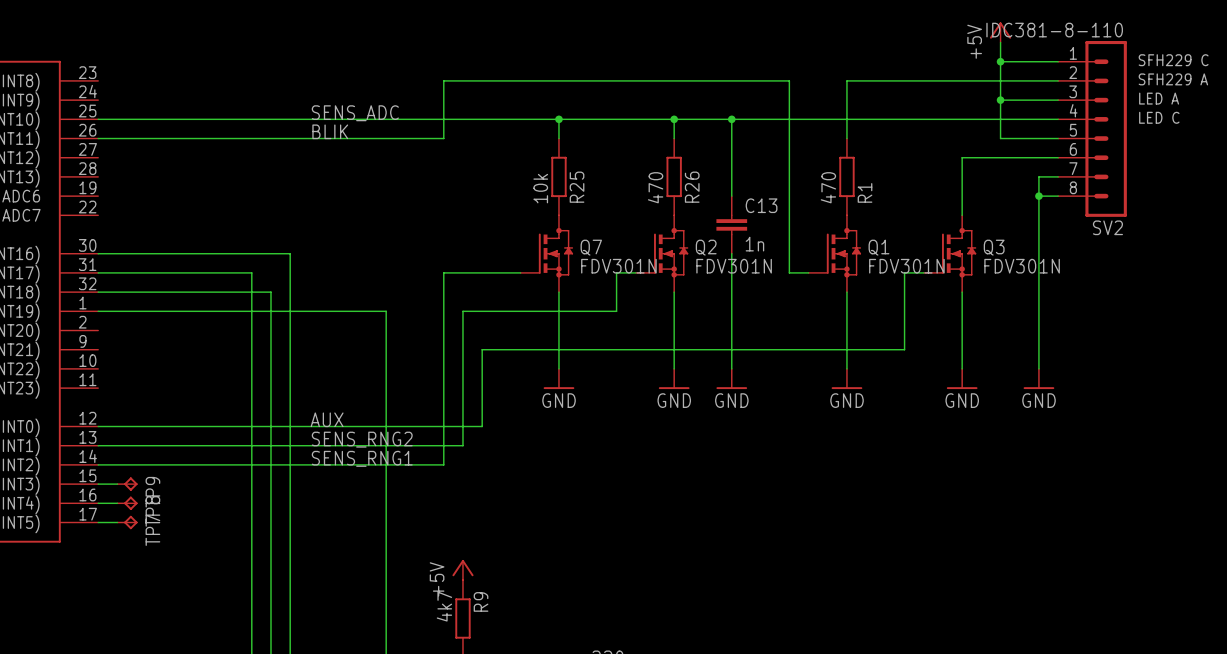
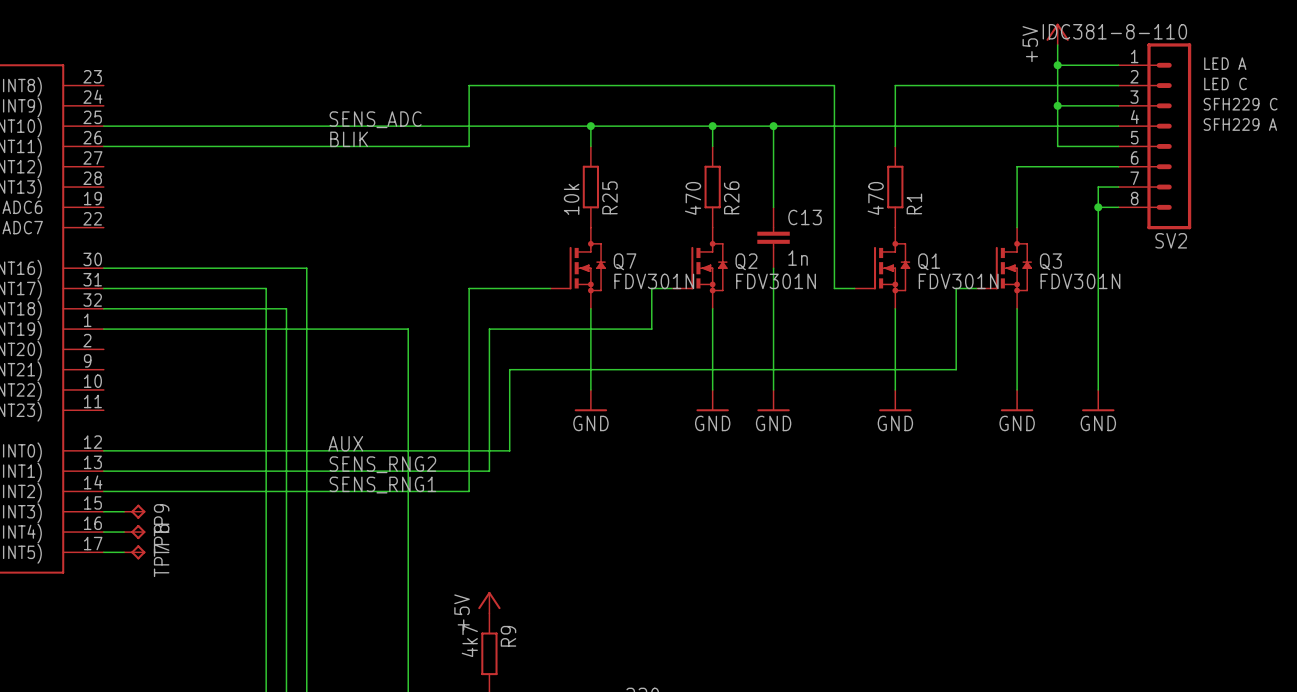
text: SFH229 C (1173, 60) -> LED A (1225, 63)
text: SFH229 A (1173, 79) -> LED C (1225, 83)
text: LED A (1159, 98) -> SFH229 C (1240, 104)
text: LED C (1159, 117) -> SFH229 A (1240, 124)

